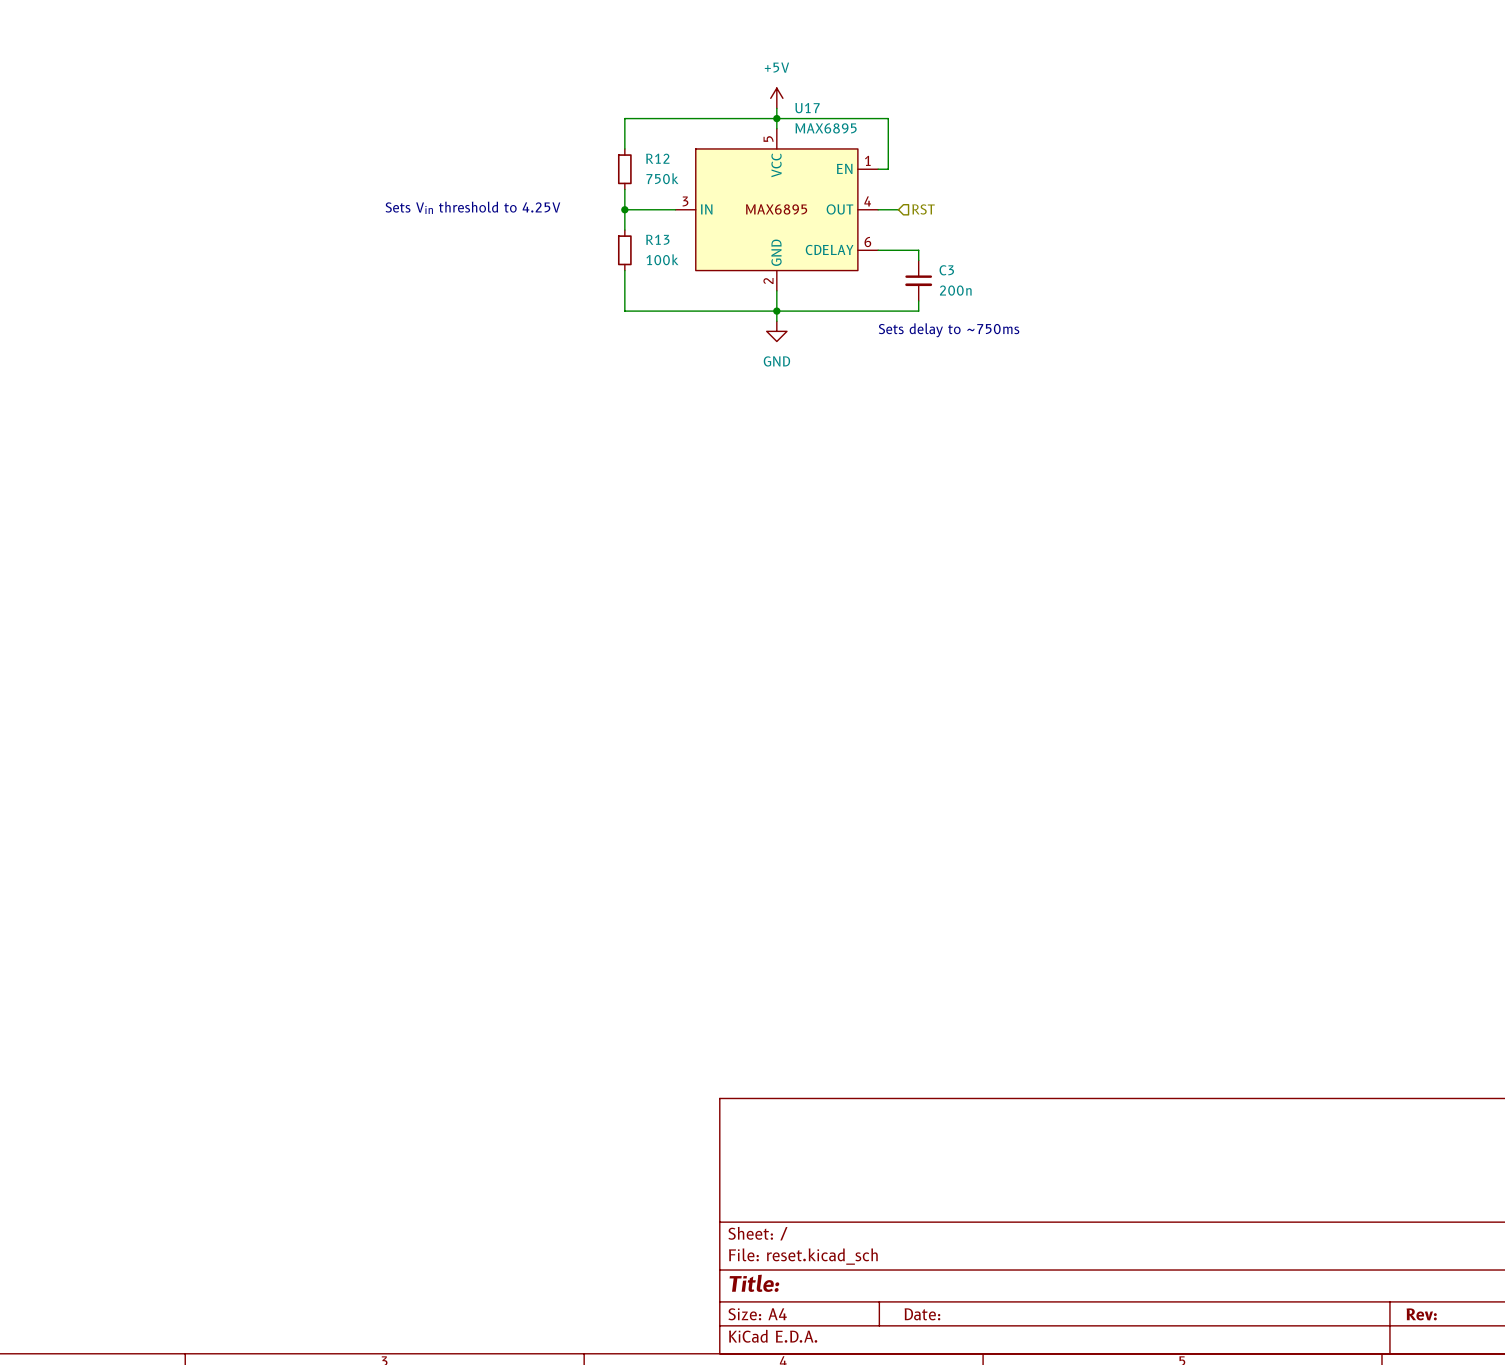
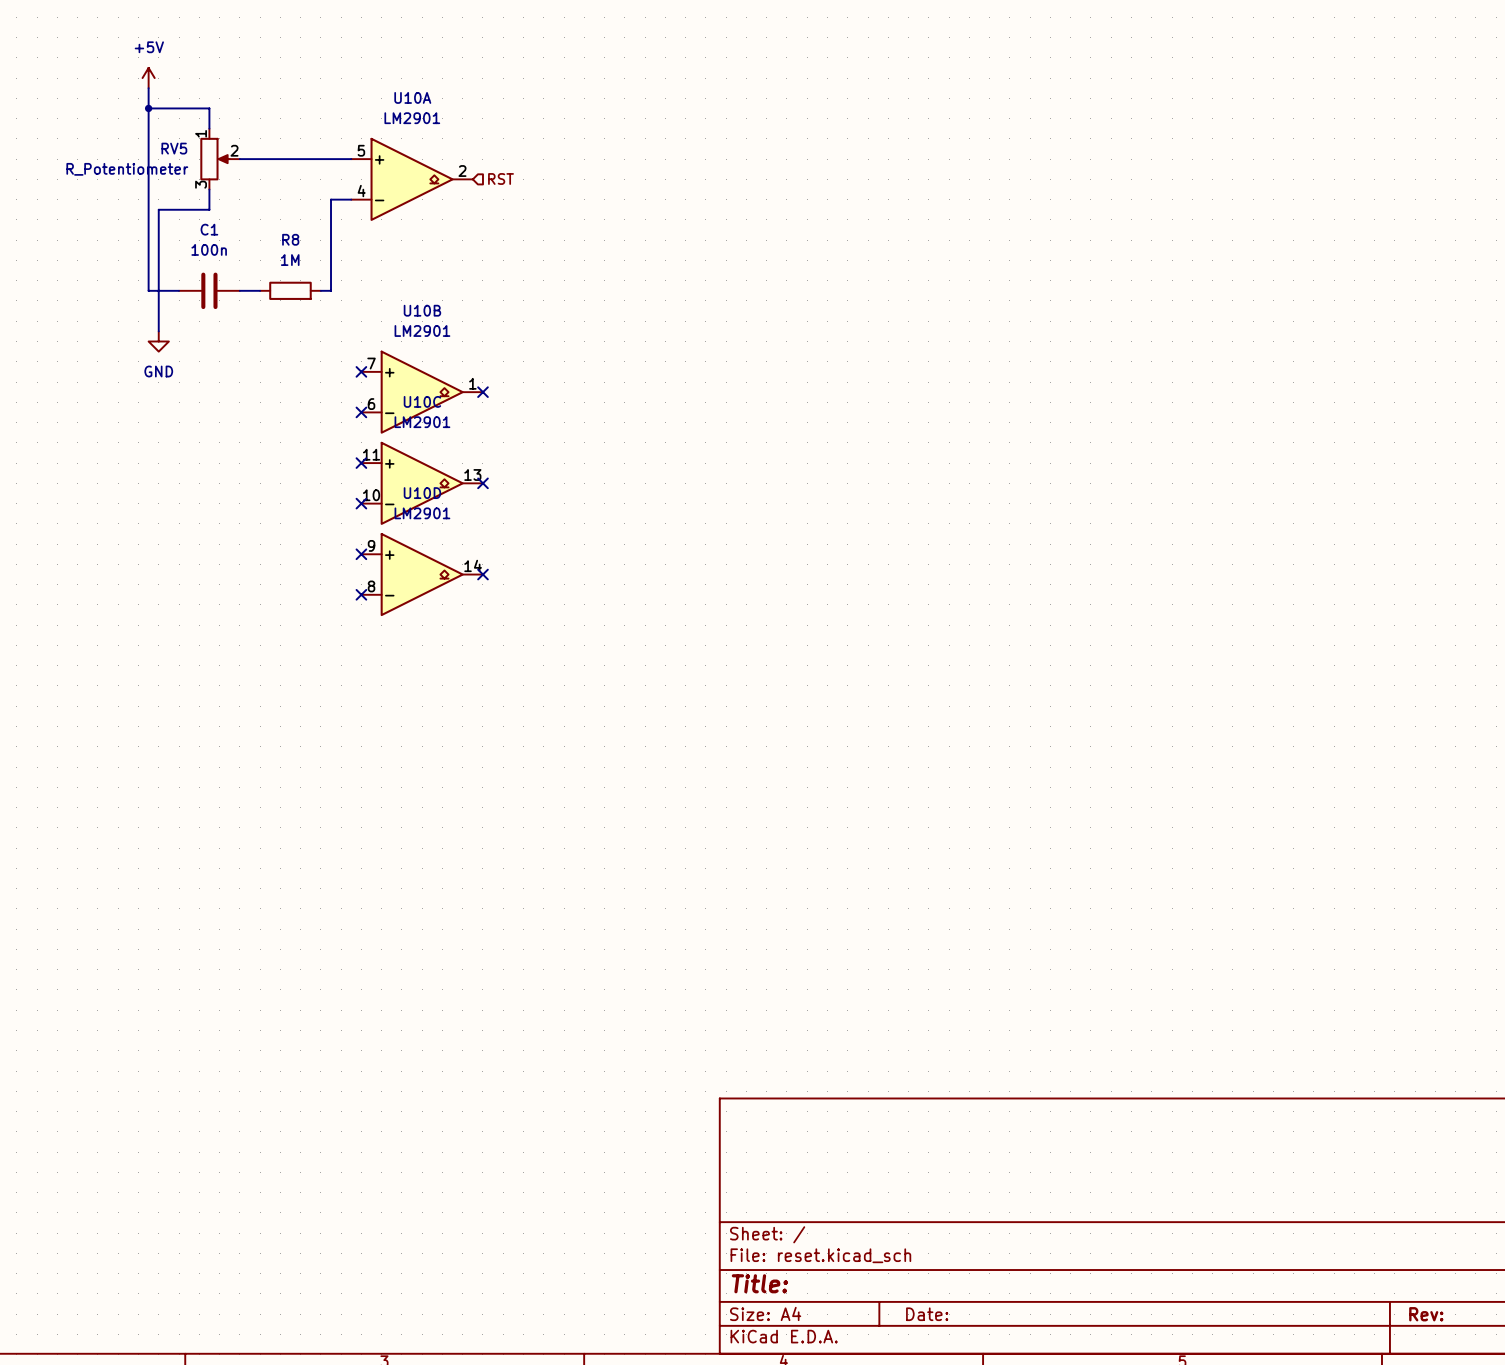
power symbol: none -> +5V (148, 78)
wire: none -> (148, 88) (148, 290) (179, 290)
power symbol: +5V (776, 98) -> none
wire: none -> (148, 108) (209, 108) (209, 128)
junction: none -> (148, 108)
wire: (776, 108) (776, 128) -> none
junction: (776, 118) -> none
wire: (624, 148) (624, 118) (888, 118) (888, 169) (878, 169) -> none
RV5: none -> R_Potentiometer (220, 159)
wire: none -> (239, 159) (351, 159)
R12: 750k (624, 169) -> none
U10A: none -> LM2901 (412, 179)
hierarchical label: none -> RST (501, 178)
wire: none -> (209, 189) (209, 209) (158, 209) (158, 331)
wire: (624, 189) (624, 230) -> none
wire: none -> (351, 199) (331, 199) (331, 290) (320, 290)
text: Sets Vin threshold to 4.25V (472, 207) -> none
wire: (624, 209) (675, 209) -> none
junction: (624, 209) -> none
U17: MAX6895 (776, 209) -> none
wire: (878, 209) (898, 209) -> none
hierarchical label: RST (923, 209) -> none
R13: 100k (624, 250) -> none
wire: (878, 250) (918, 250) (918, 260) -> none
wire: (624, 270) (624, 311) (918, 311) (918, 300) -> none
C3: 200n (918, 280) -> none
C1: none -> 100n (209, 290)
wire: none -> (239, 290) (260, 290)
R8: none -> 1M (290, 290)
wire: (776, 290) (776, 321) -> none
junction: (776, 311) -> none
text: Sets delay to ~750ms (949, 330) -> none
power symbol: GND (776, 331) -> none
power symbol: none -> GND (158, 341)
no-connect mark: none -> (361, 371)
U10B: none -> LM2901 (422, 392)
no-connect mark: none -> (482, 392)
no-connect mark: none -> (361, 412)
no-connect mark: none -> (361, 463)
U10C: none -> LM2901 (422, 483)
no-connect mark: none -> (482, 483)
no-connect mark: none -> (361, 503)
no-connect mark: none -> (361, 554)
U10D: none -> LM2901 (422, 574)
no-connect mark: none -> (482, 574)
no-connect mark: none -> (361, 594)

